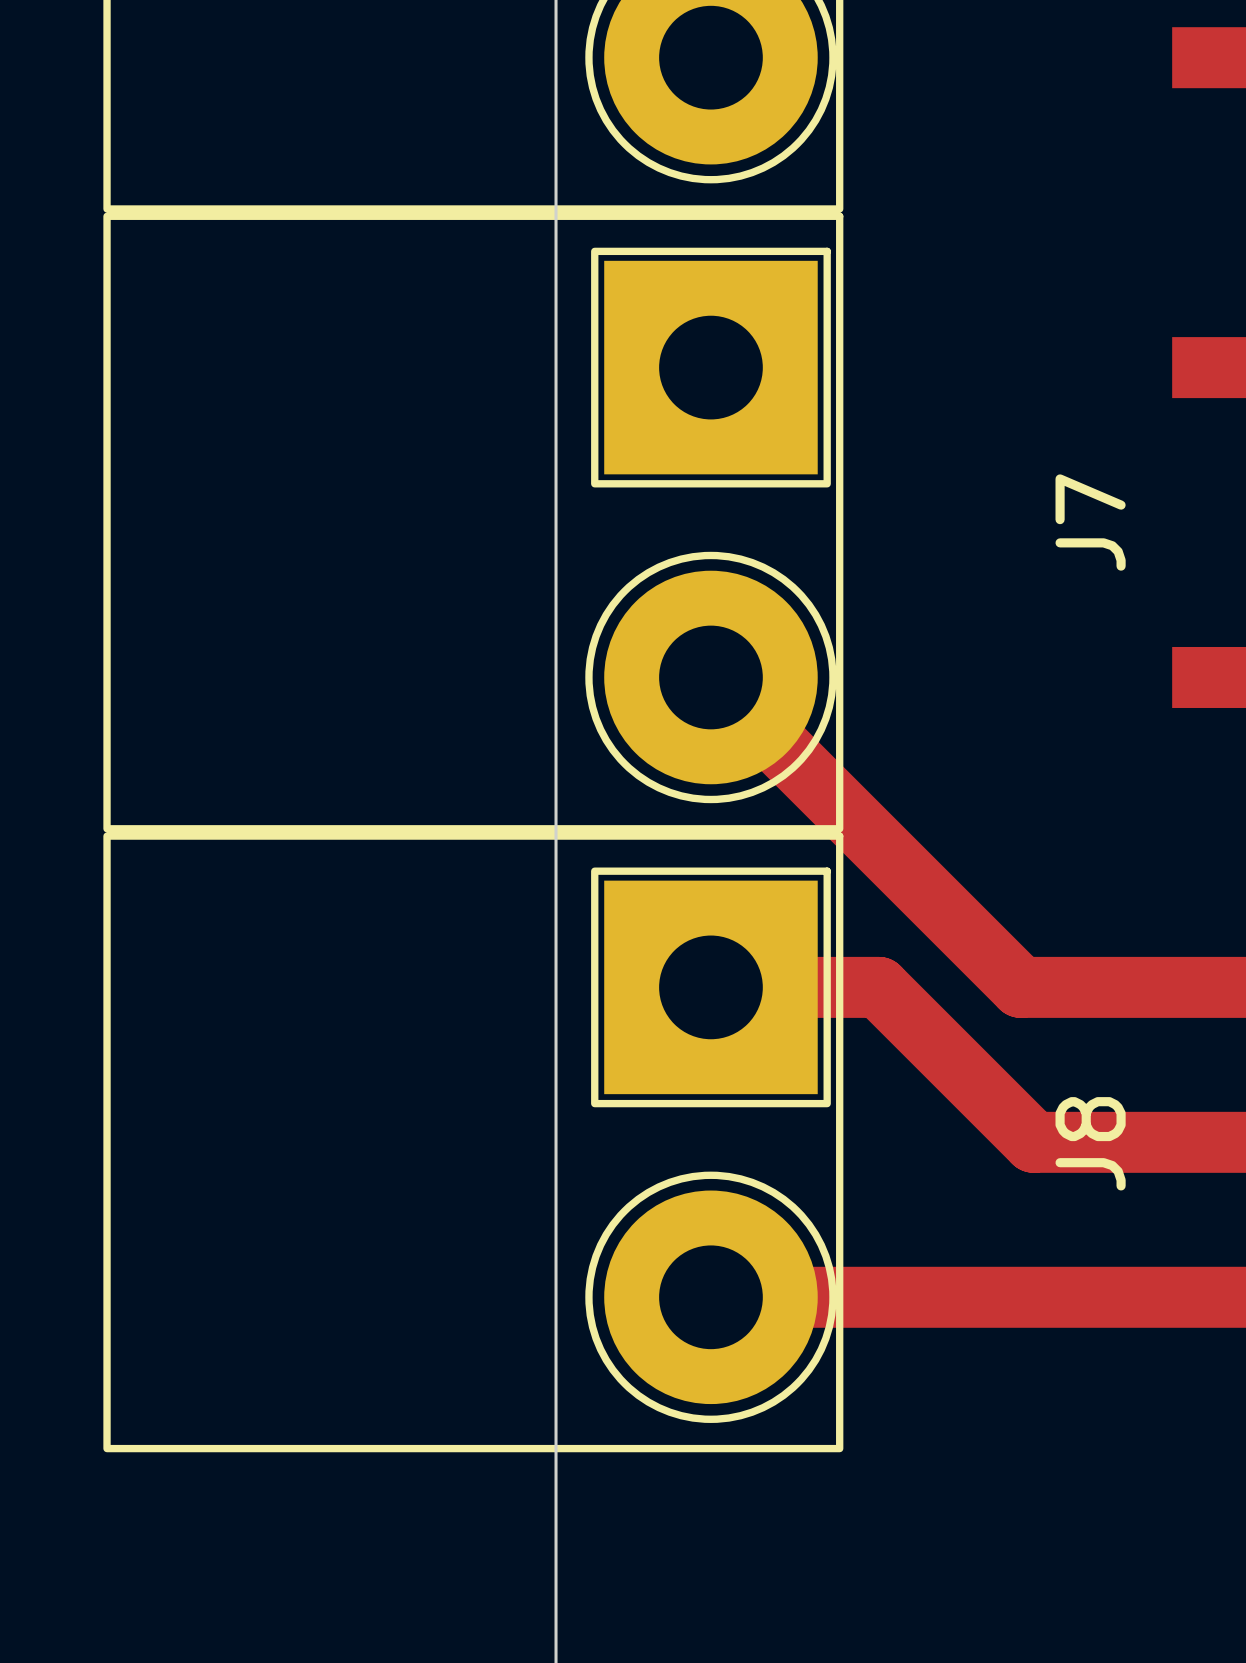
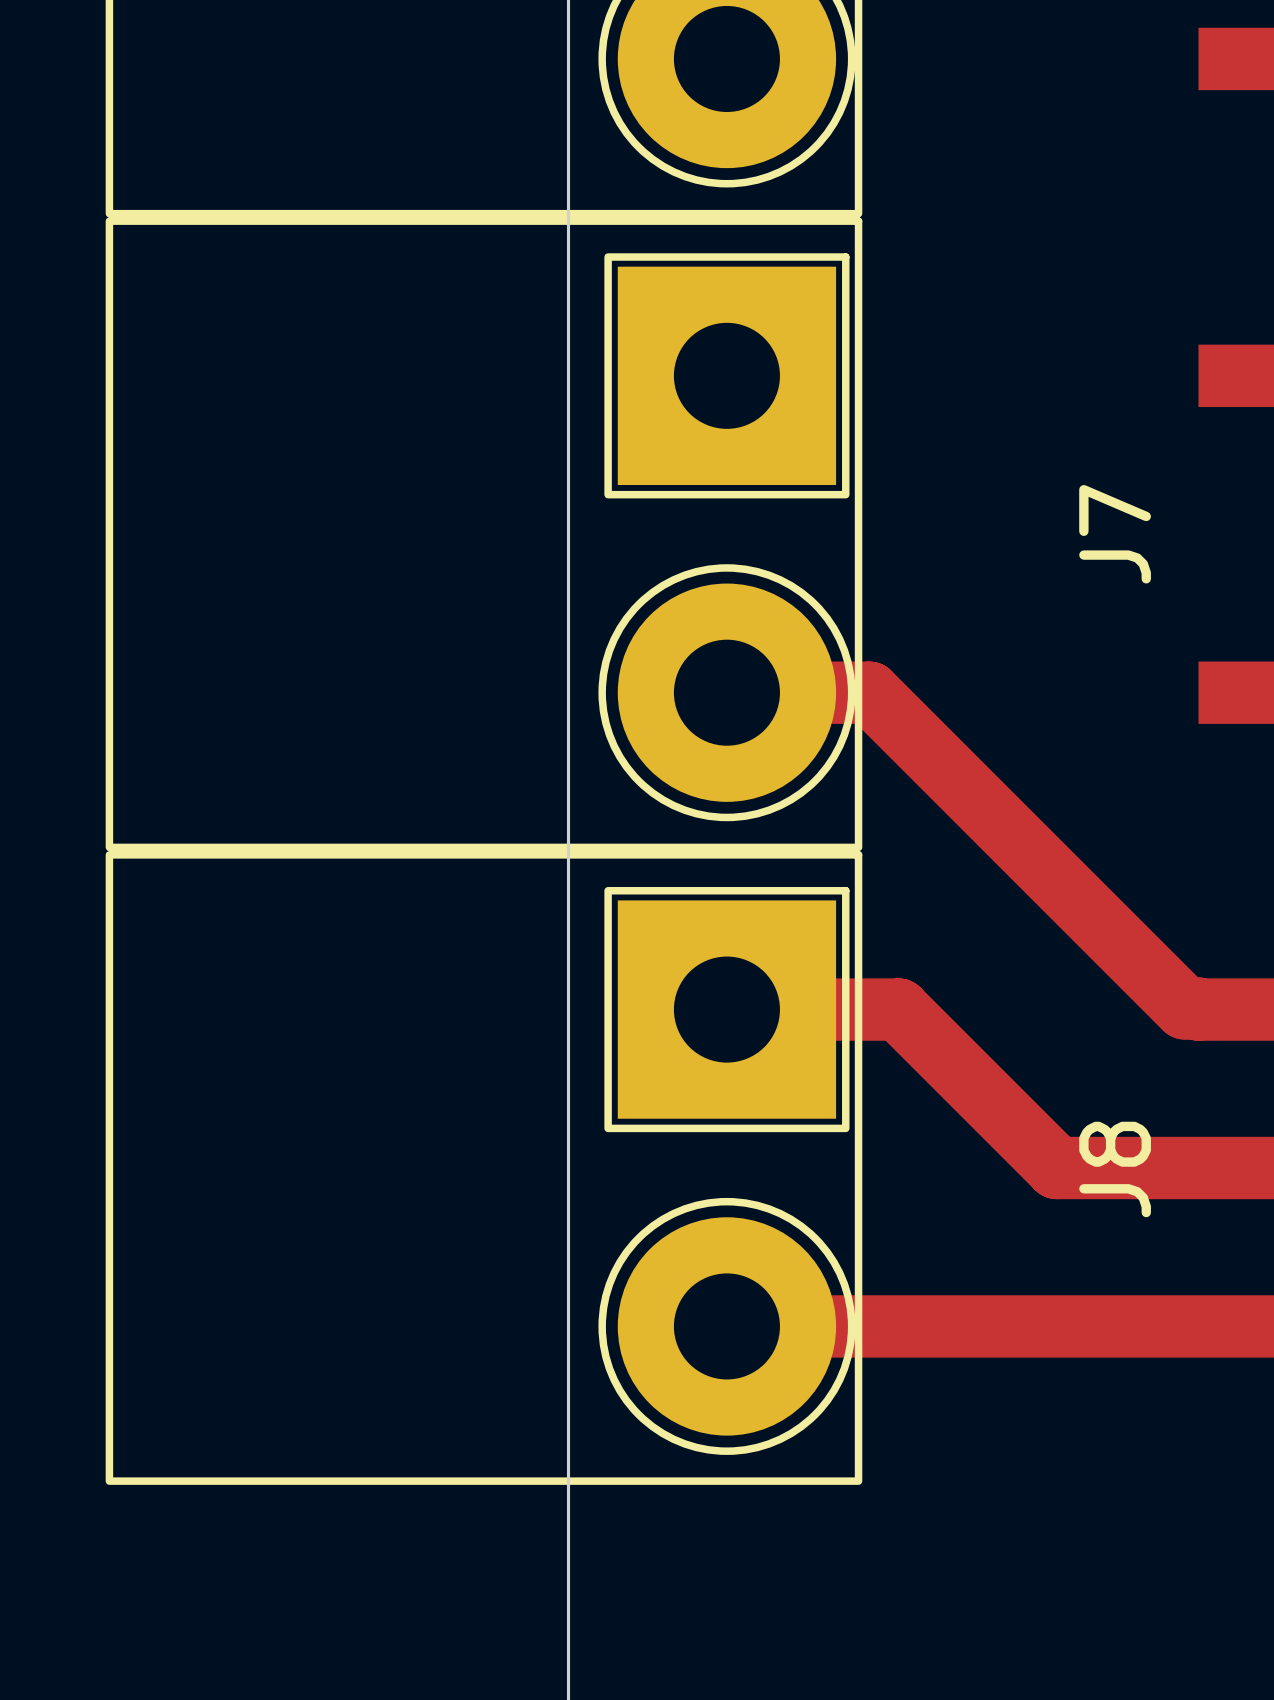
track: (710, 677) (1020, 987) (1172, 987) -> (726, 692) (869, 692) (1185, 1008) (1198, 1009)

